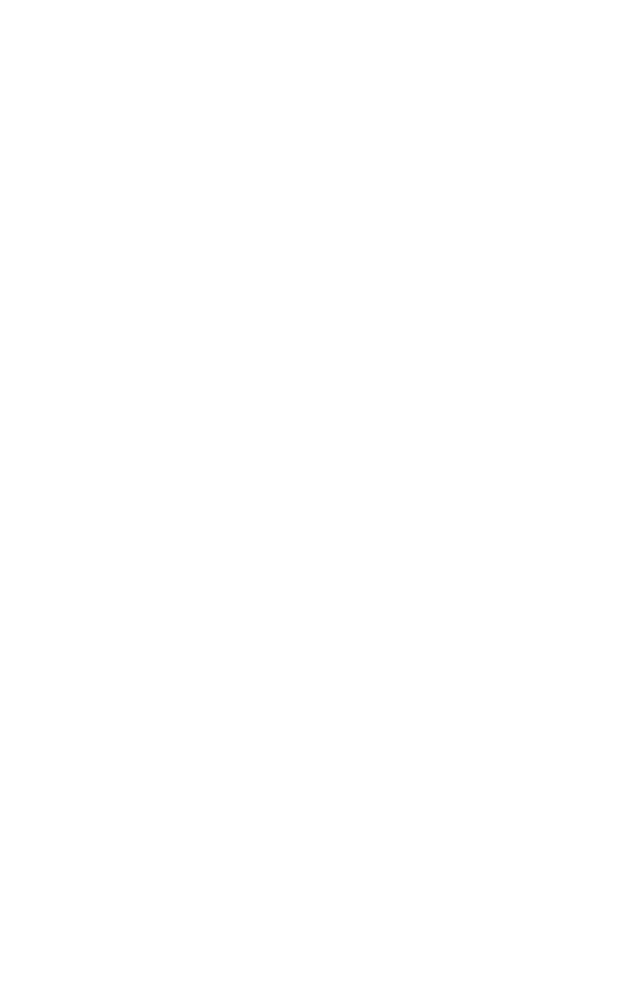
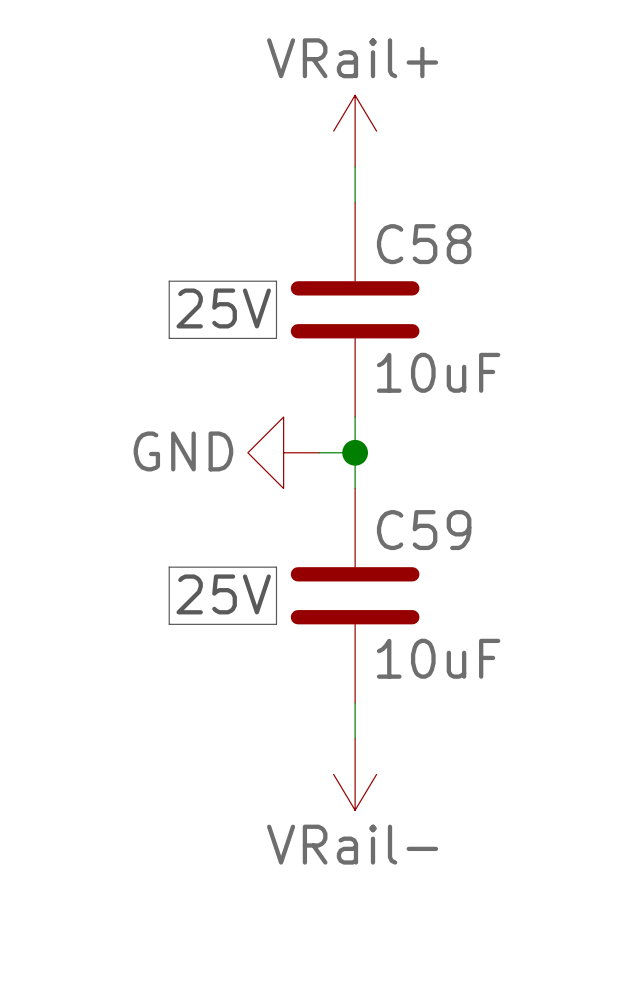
power symbol: none -> VRail+ (355, 131)
wire: none -> (355, 166) (355, 202)
line: none -> (169, 281) (169, 338) (276, 338) (276, 281) (169, 281)
text: none -> 25V (223, 308)
C58: none -> 10uF (355, 309)
wire: none -> (355, 417) (355, 488)
power symbol: none -> GND (283, 452)
wire: none -> (319, 452) (355, 452)
junction: none -> (355, 452)
line: none -> (169, 567) (276, 567) (276, 624) (169, 624) (169, 567)
text: none -> 25V (223, 594)
C59: none -> 10uF (355, 595)
wire: none -> (355, 702) (355, 738)
power symbol: none -> VRail- (355, 774)

